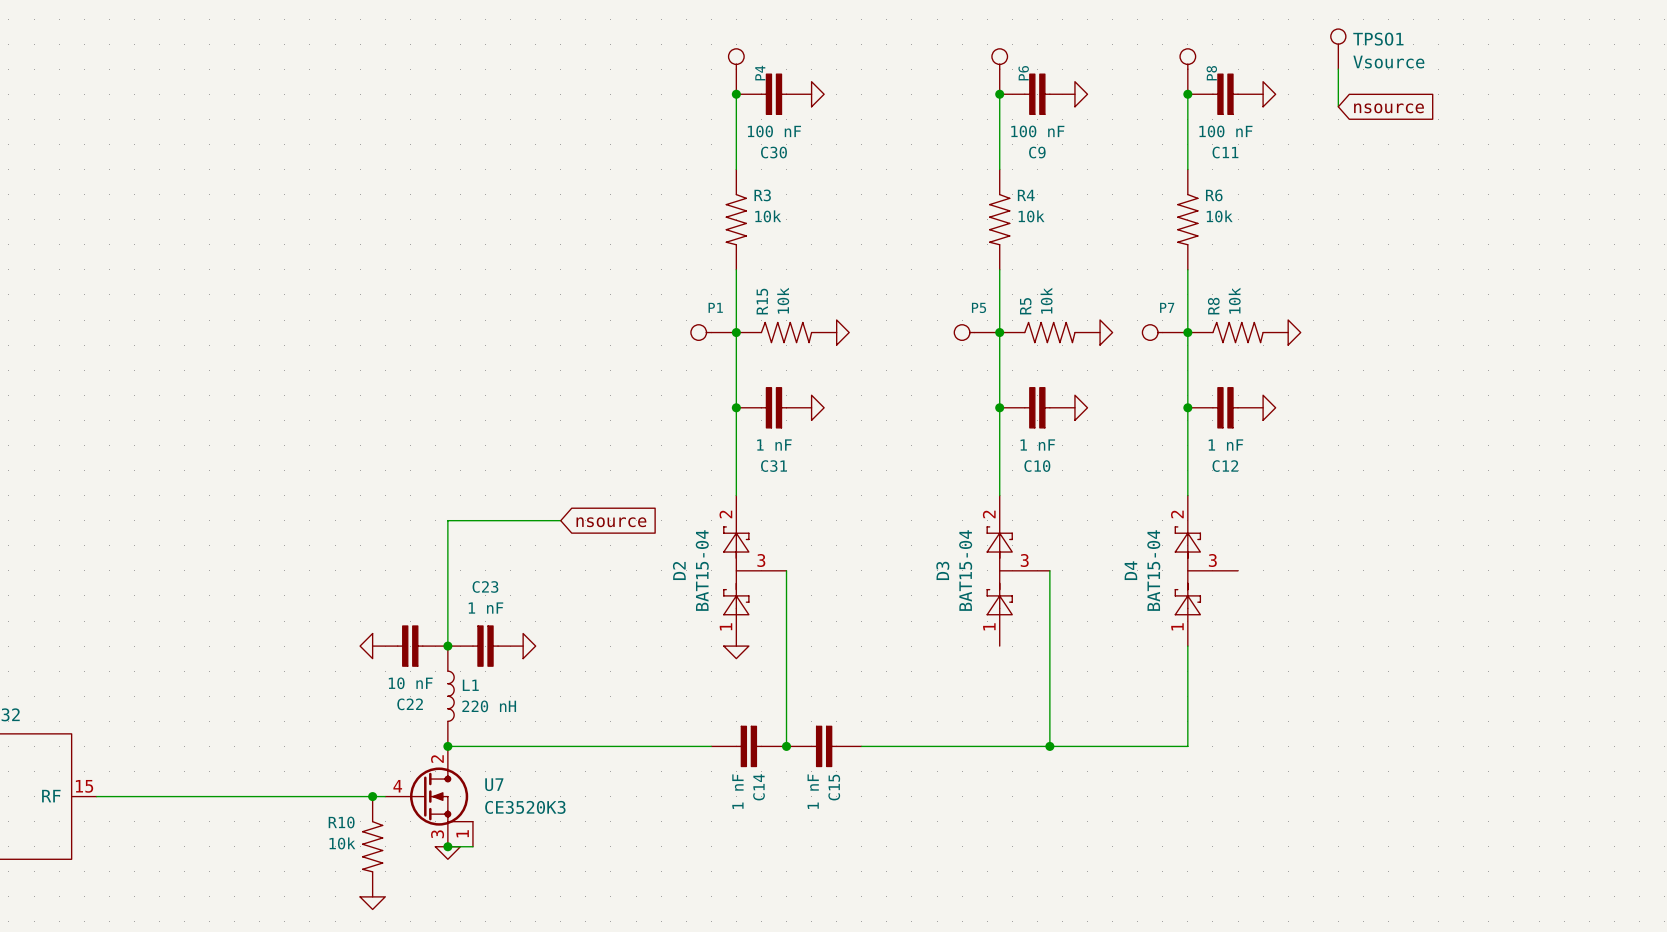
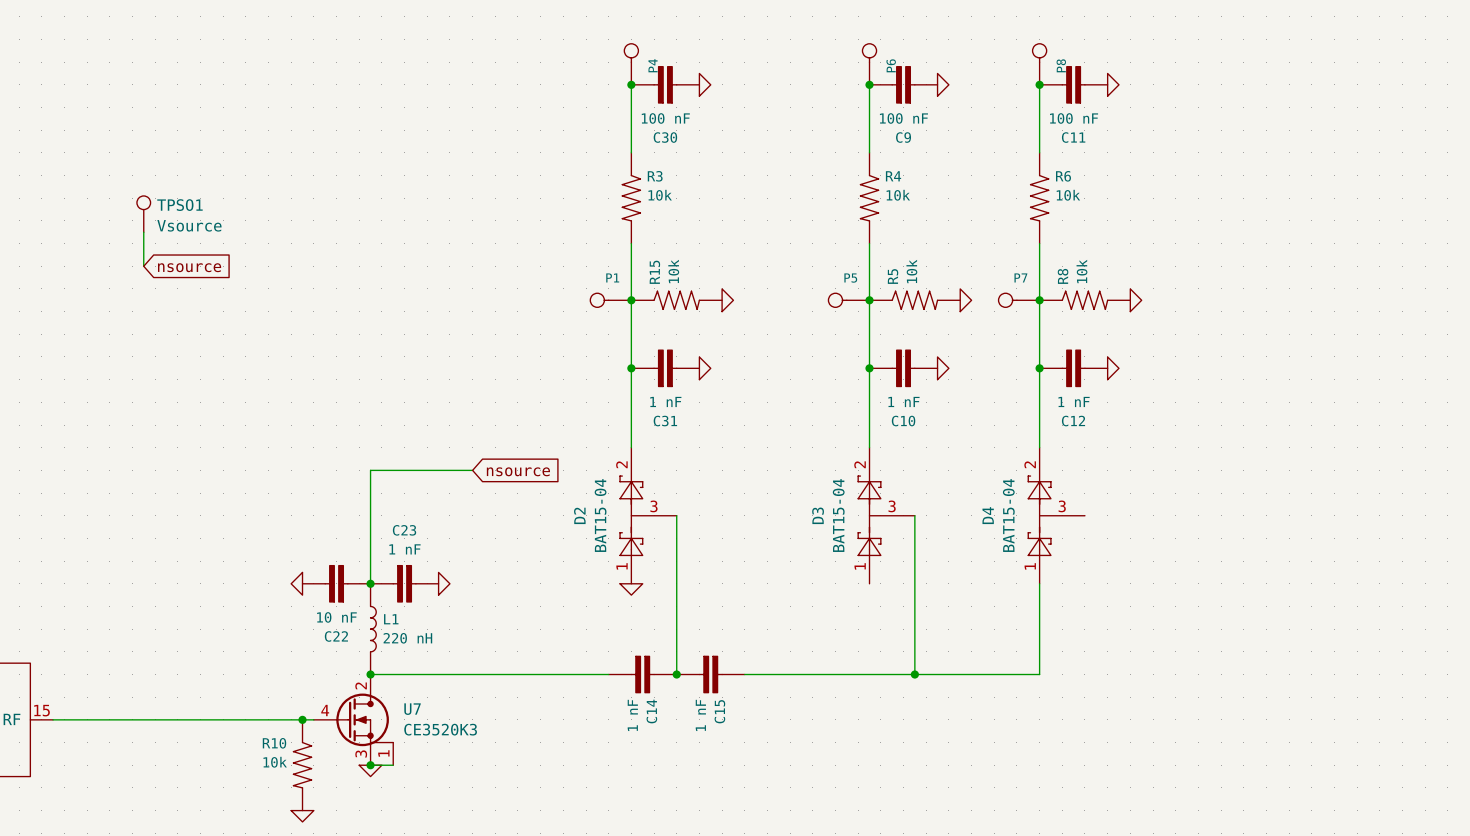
TPSO1 position: (1338, 49) -> (143, 214)
wire: (1338, 69) (1338, 106) -> none
global label: nsource (1389, 108) -> none
wire: none -> (143, 232) (143, 266)
global label: none -> nsource (189, 267)

